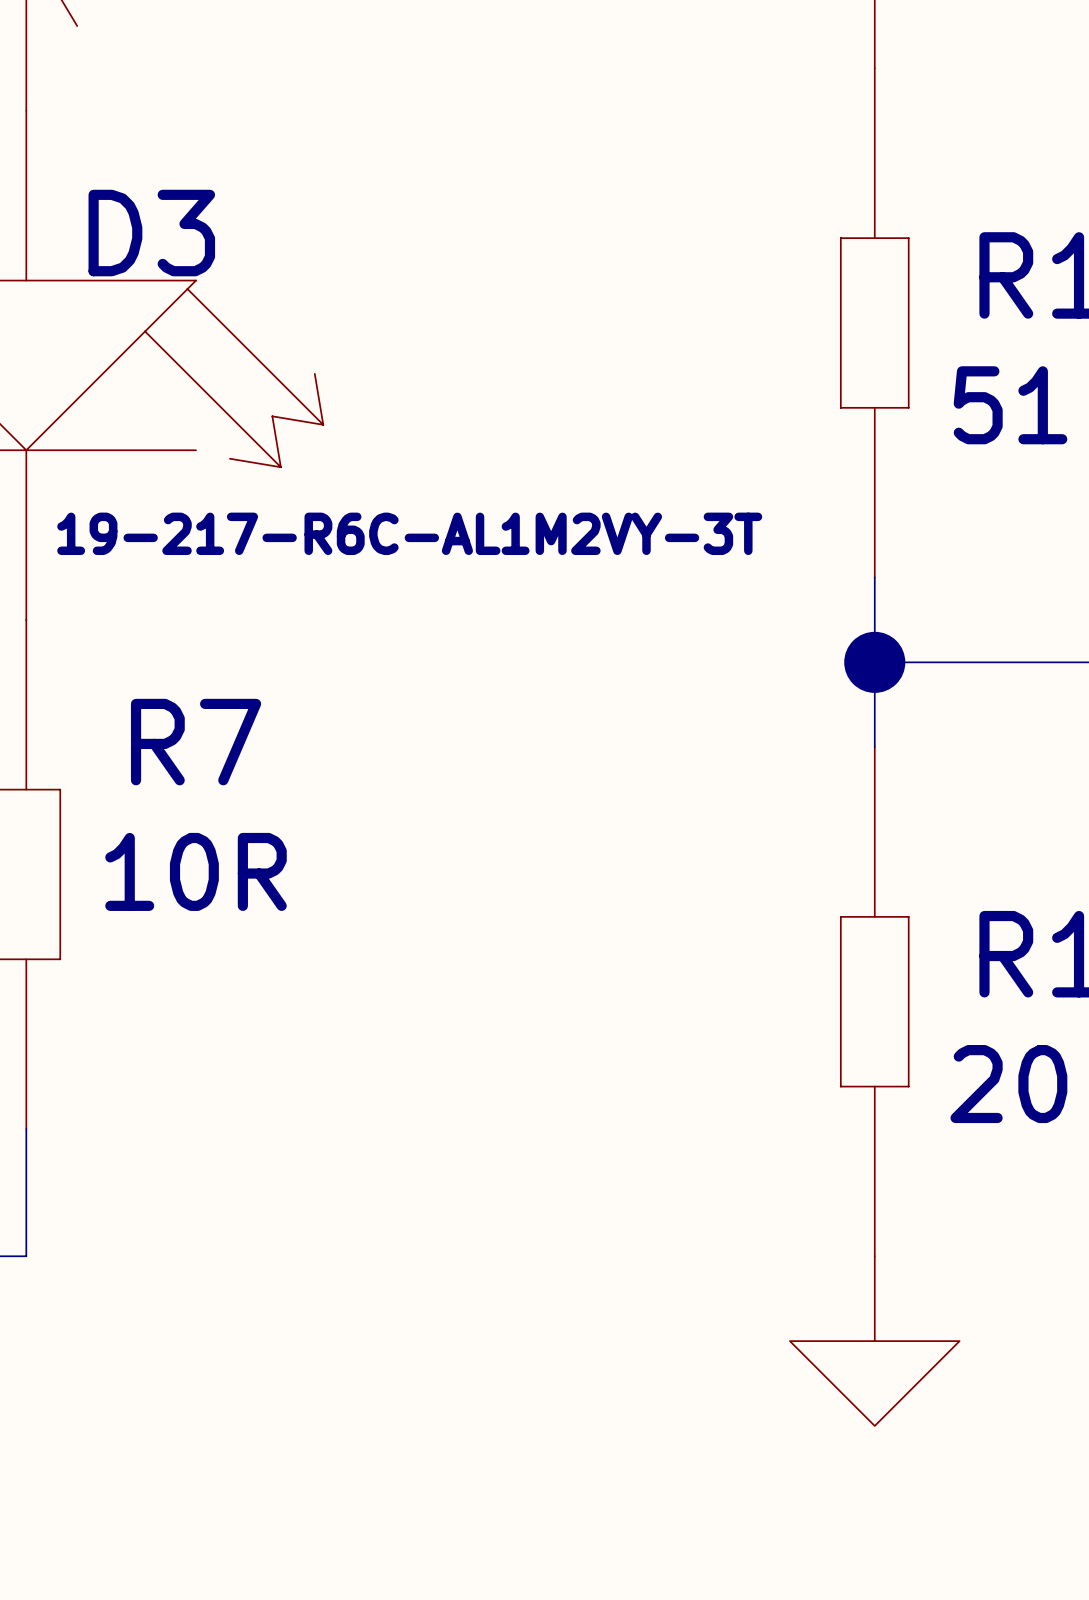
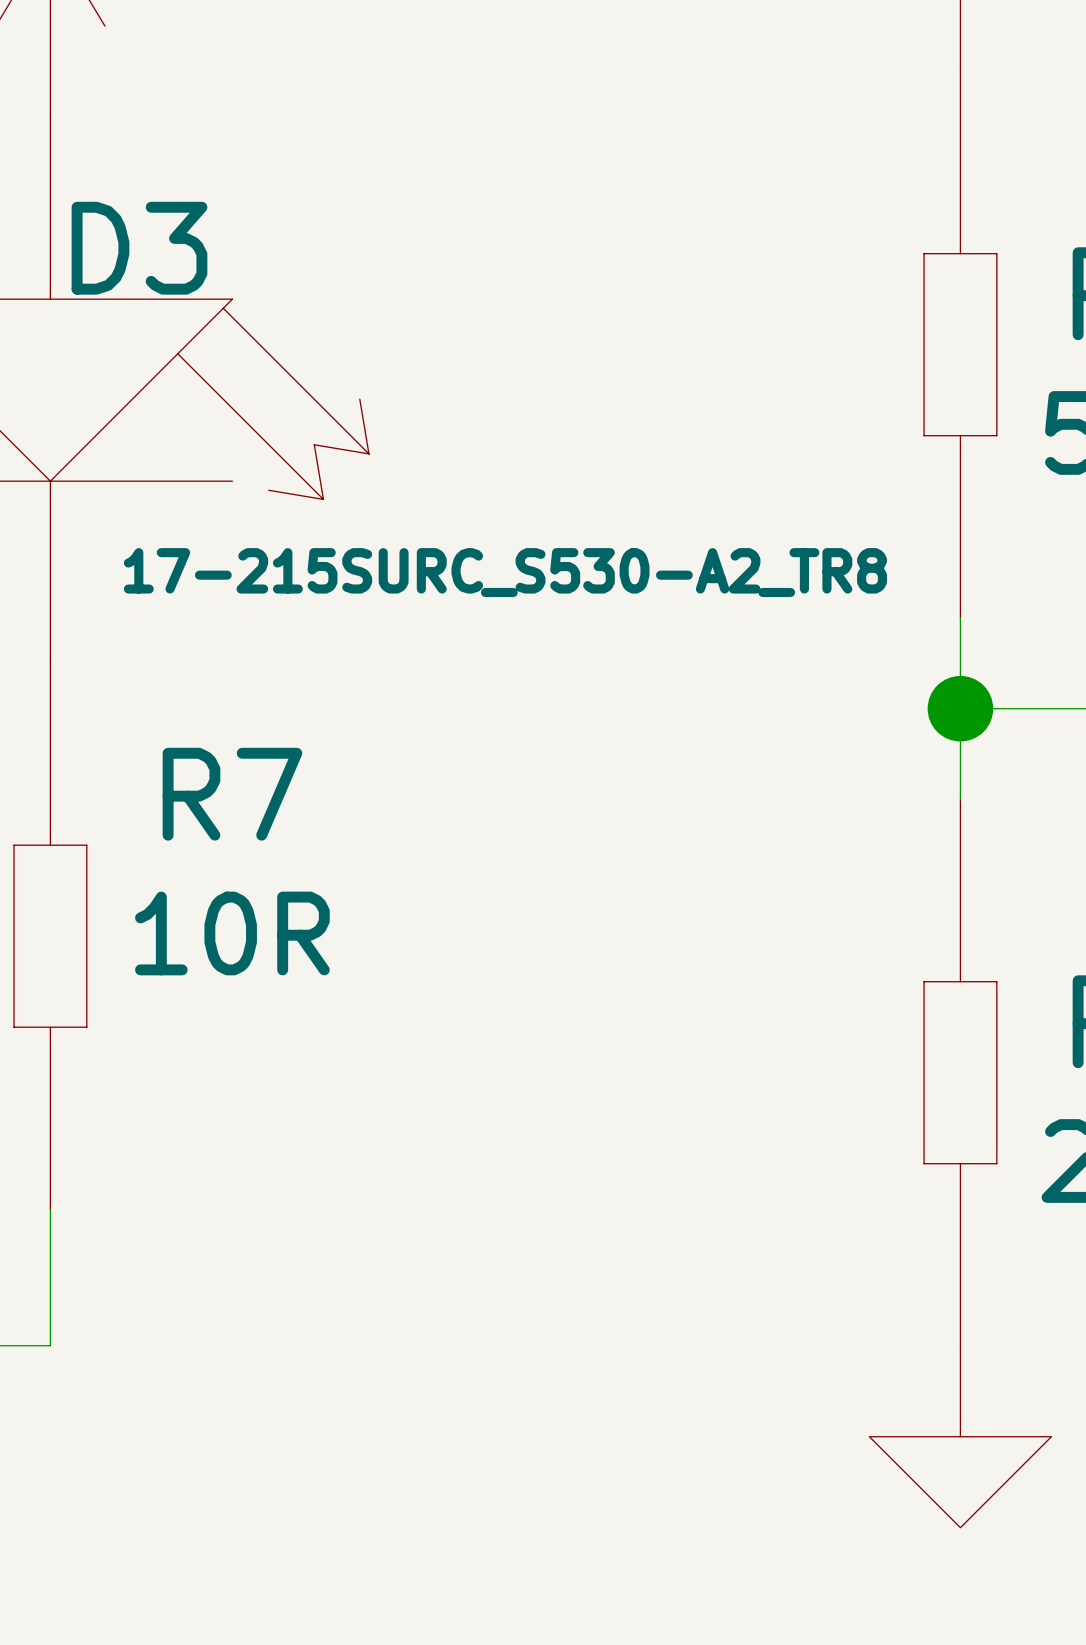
D3 name position: D3 (151, 233) -> D3 (139, 248)
D3 text: 19-217-R6C-AL1M2VY-3T (409, 533) -> 17-215SURC_S530-A2_TR8 (505, 572)

